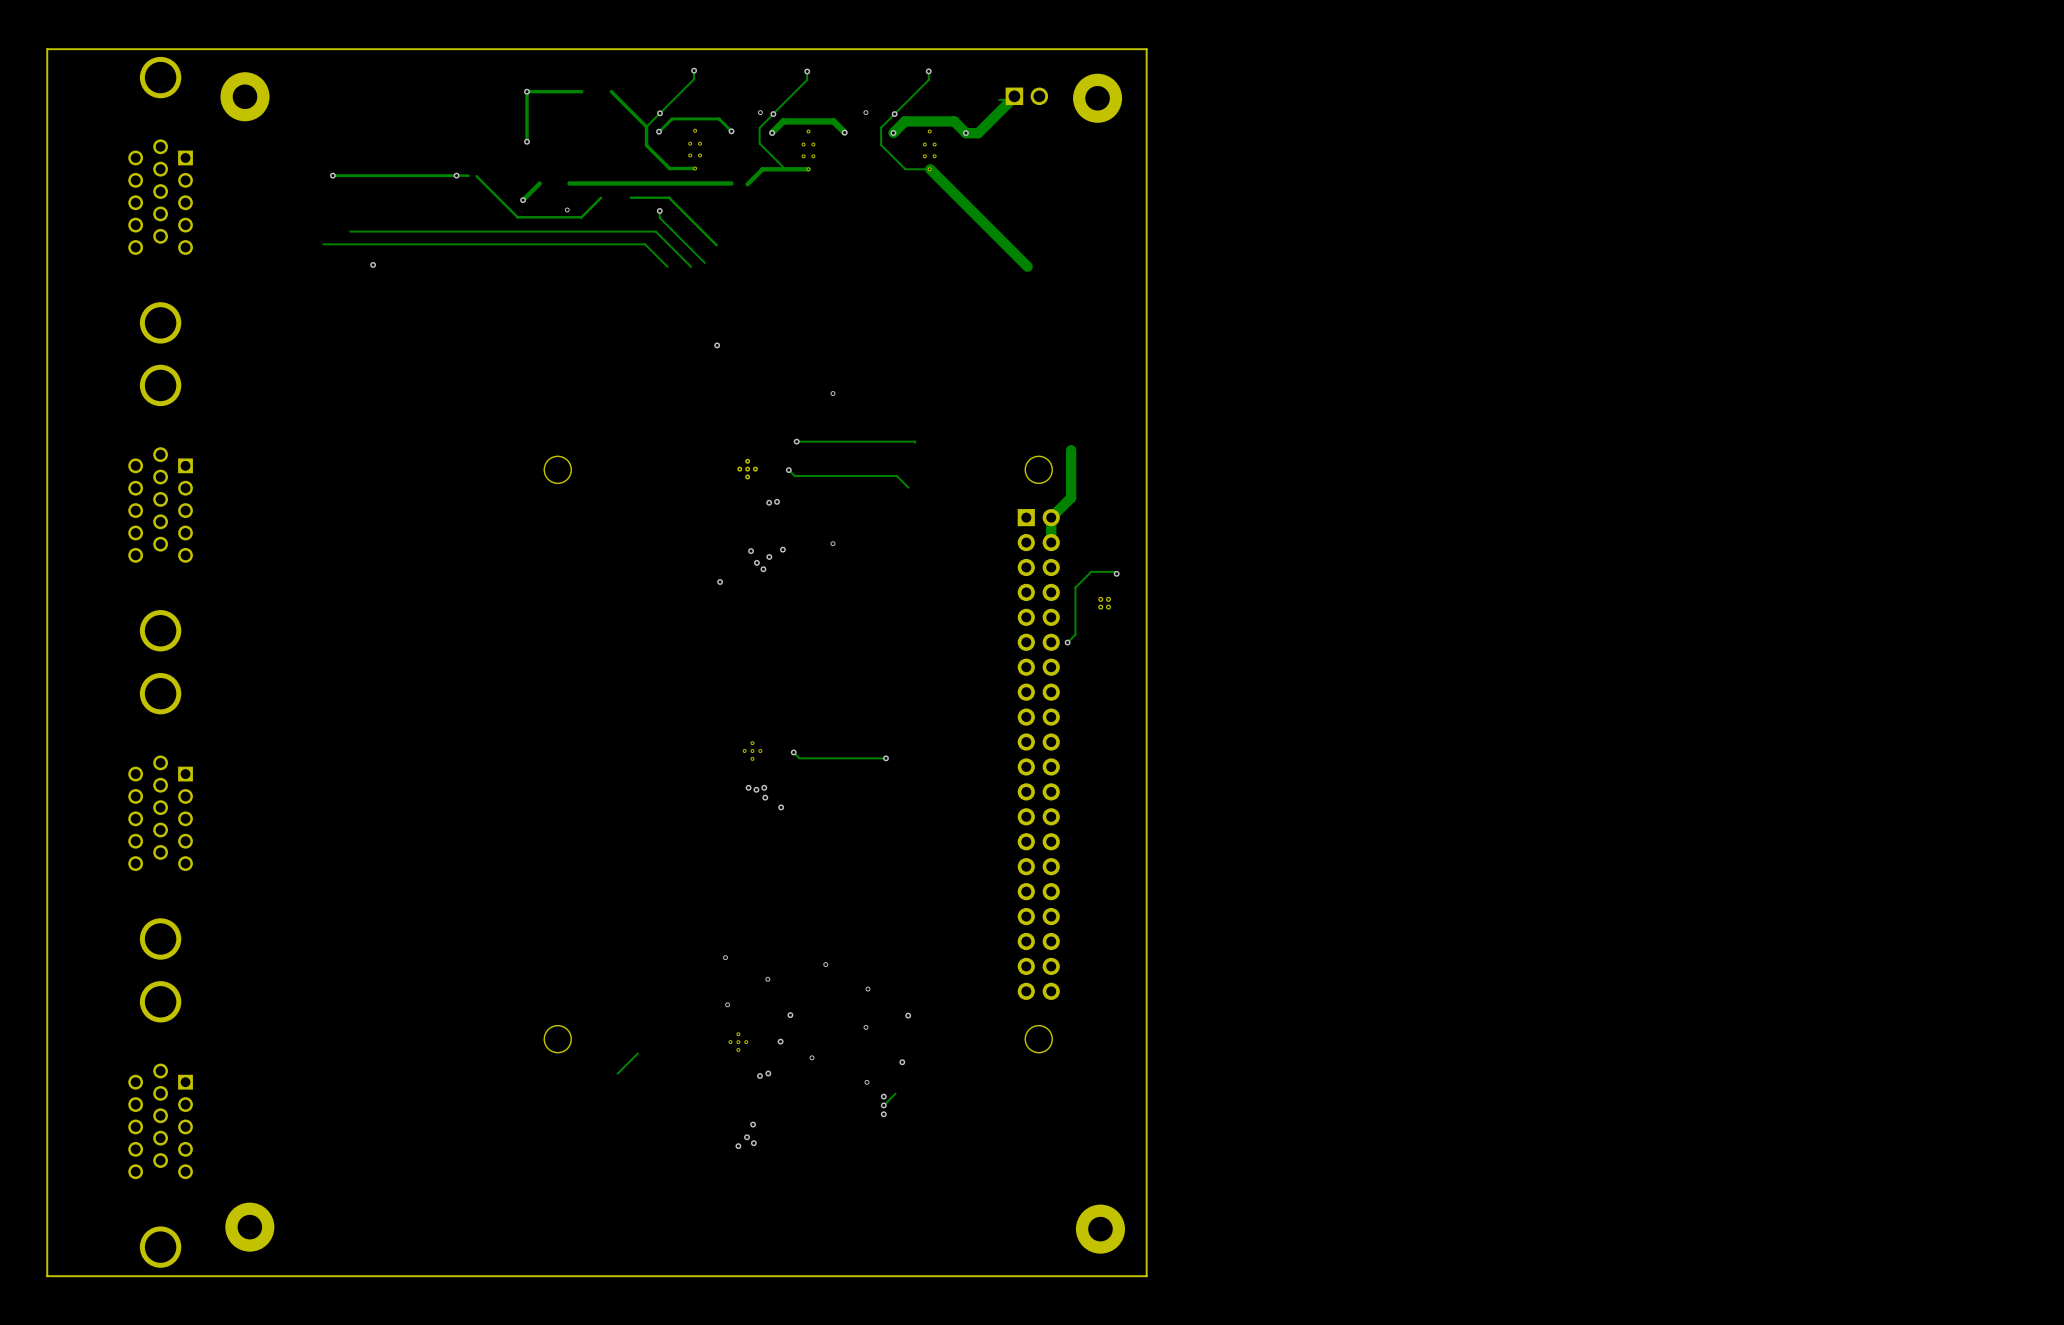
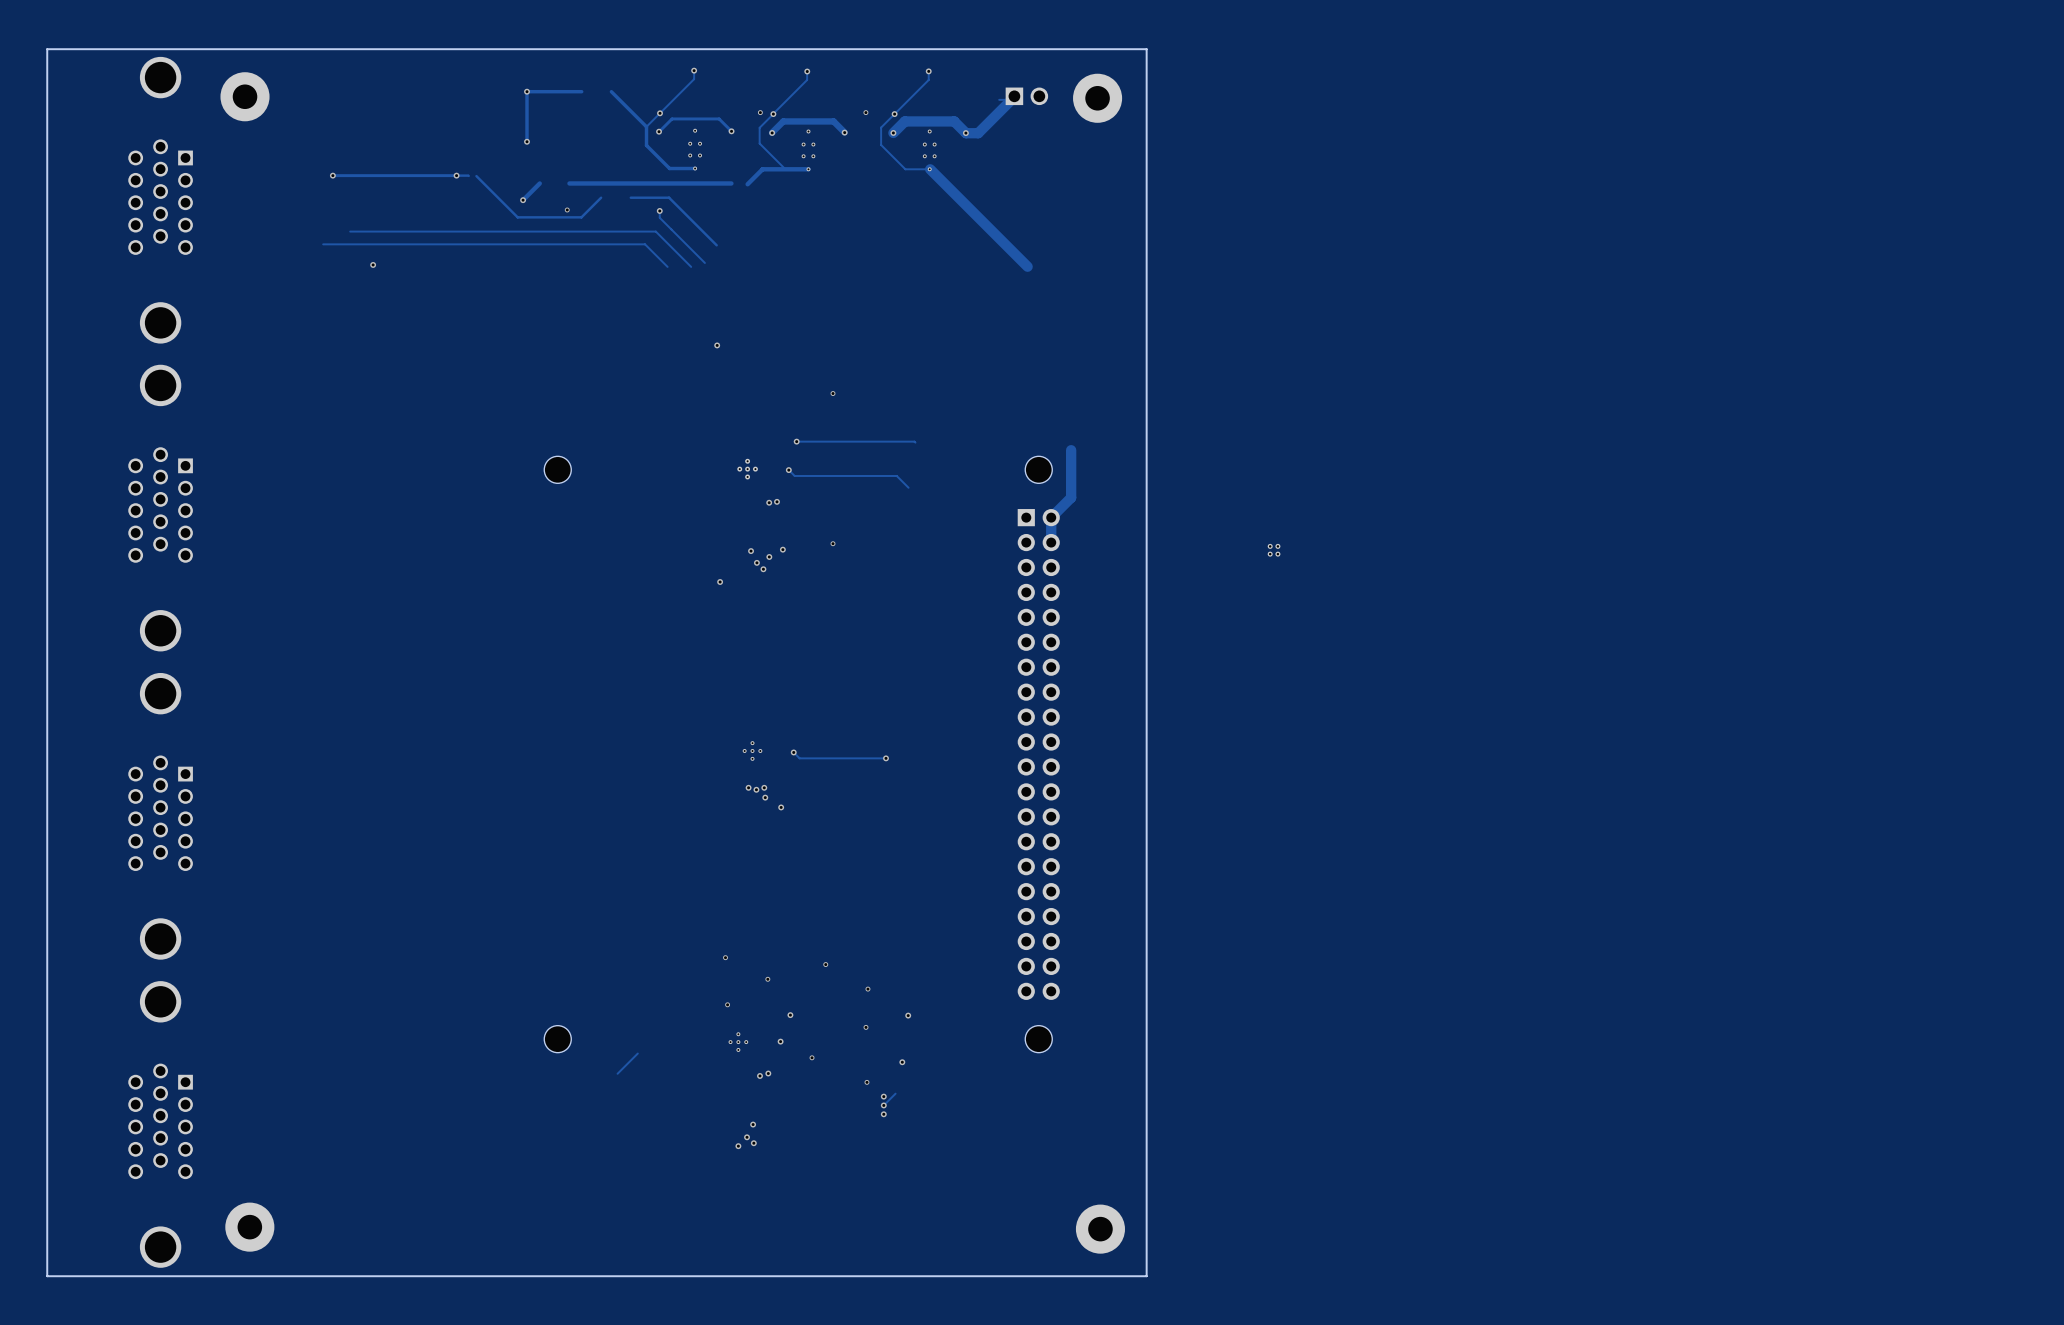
track: (1116, 573) (1114, 571) (1091, 571) (1075, 587) (1075, 634) (1067, 642) -> none
via: (1116, 573) -> none
part position: (1104, 603) -> (1274, 550)
via: (1067, 642) -> none

